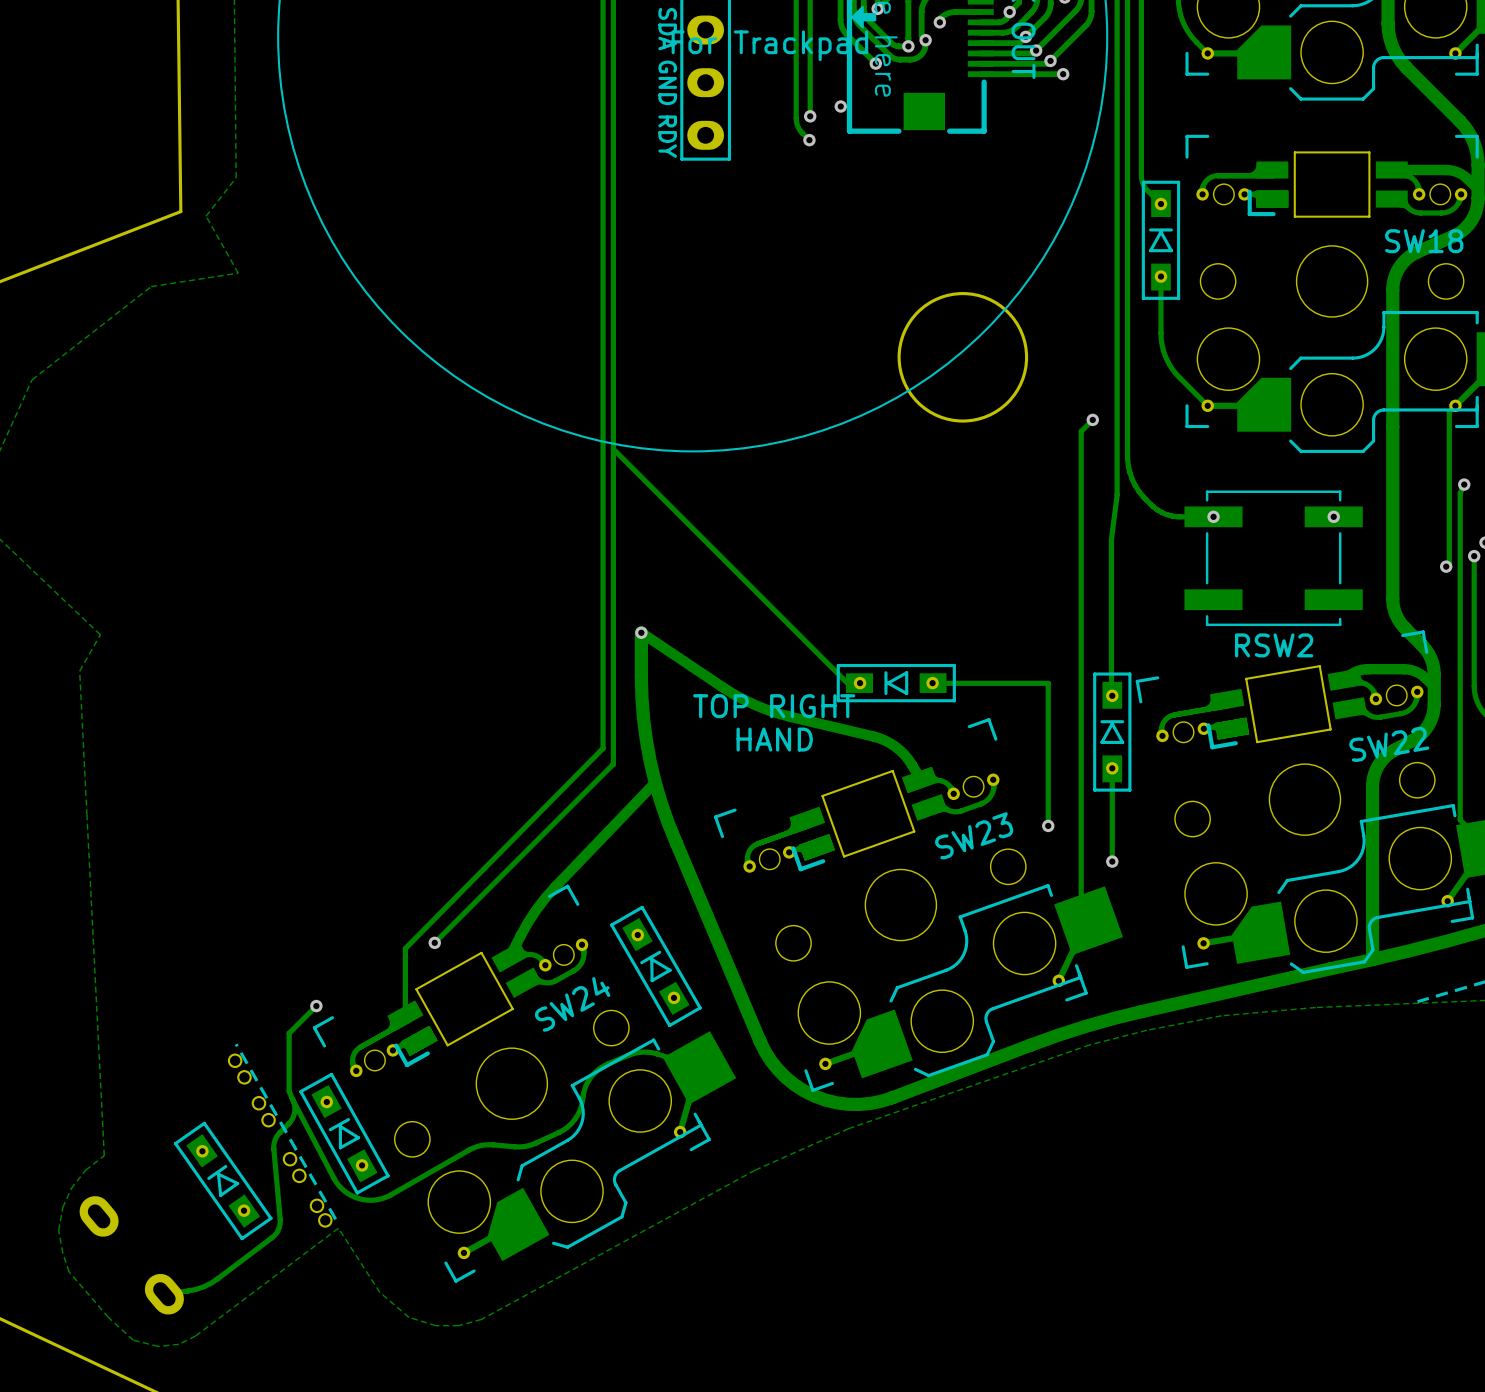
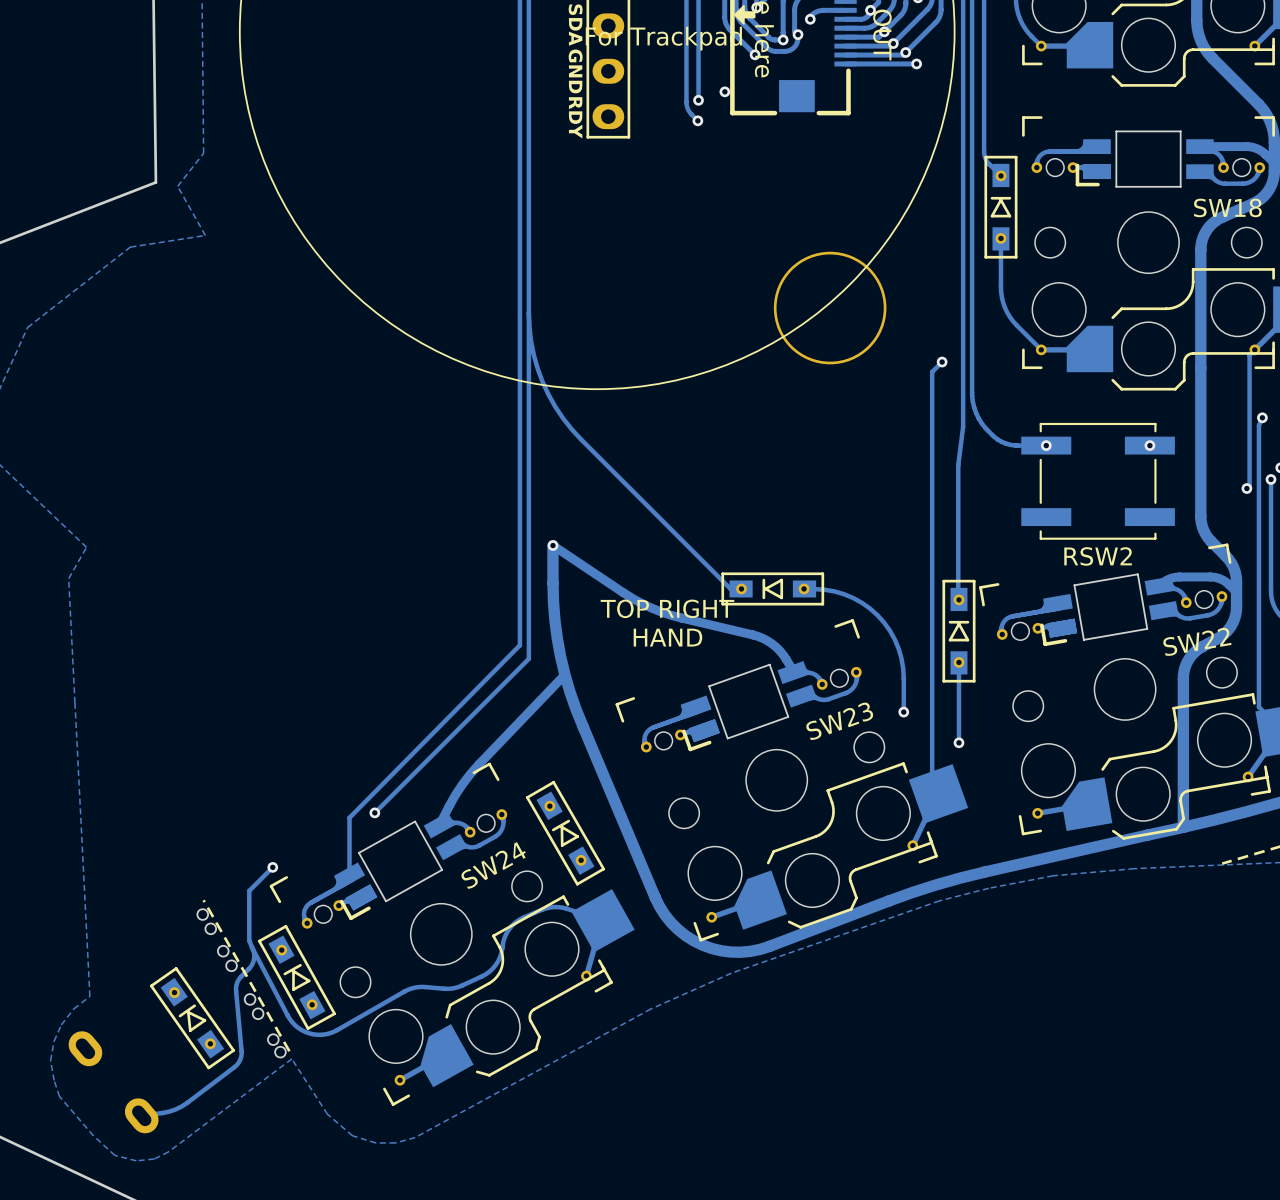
track: (613, 449) (674, 509) -> (528, 313) (533, 354) (542, 381) (555, 406) (581, 439)
track: (944, 683) (1048, 683) (1048, 786) -> (814, 589) (843, 594) (861, 602) (877, 615) (894, 639) (901, 658) (903, 678)

